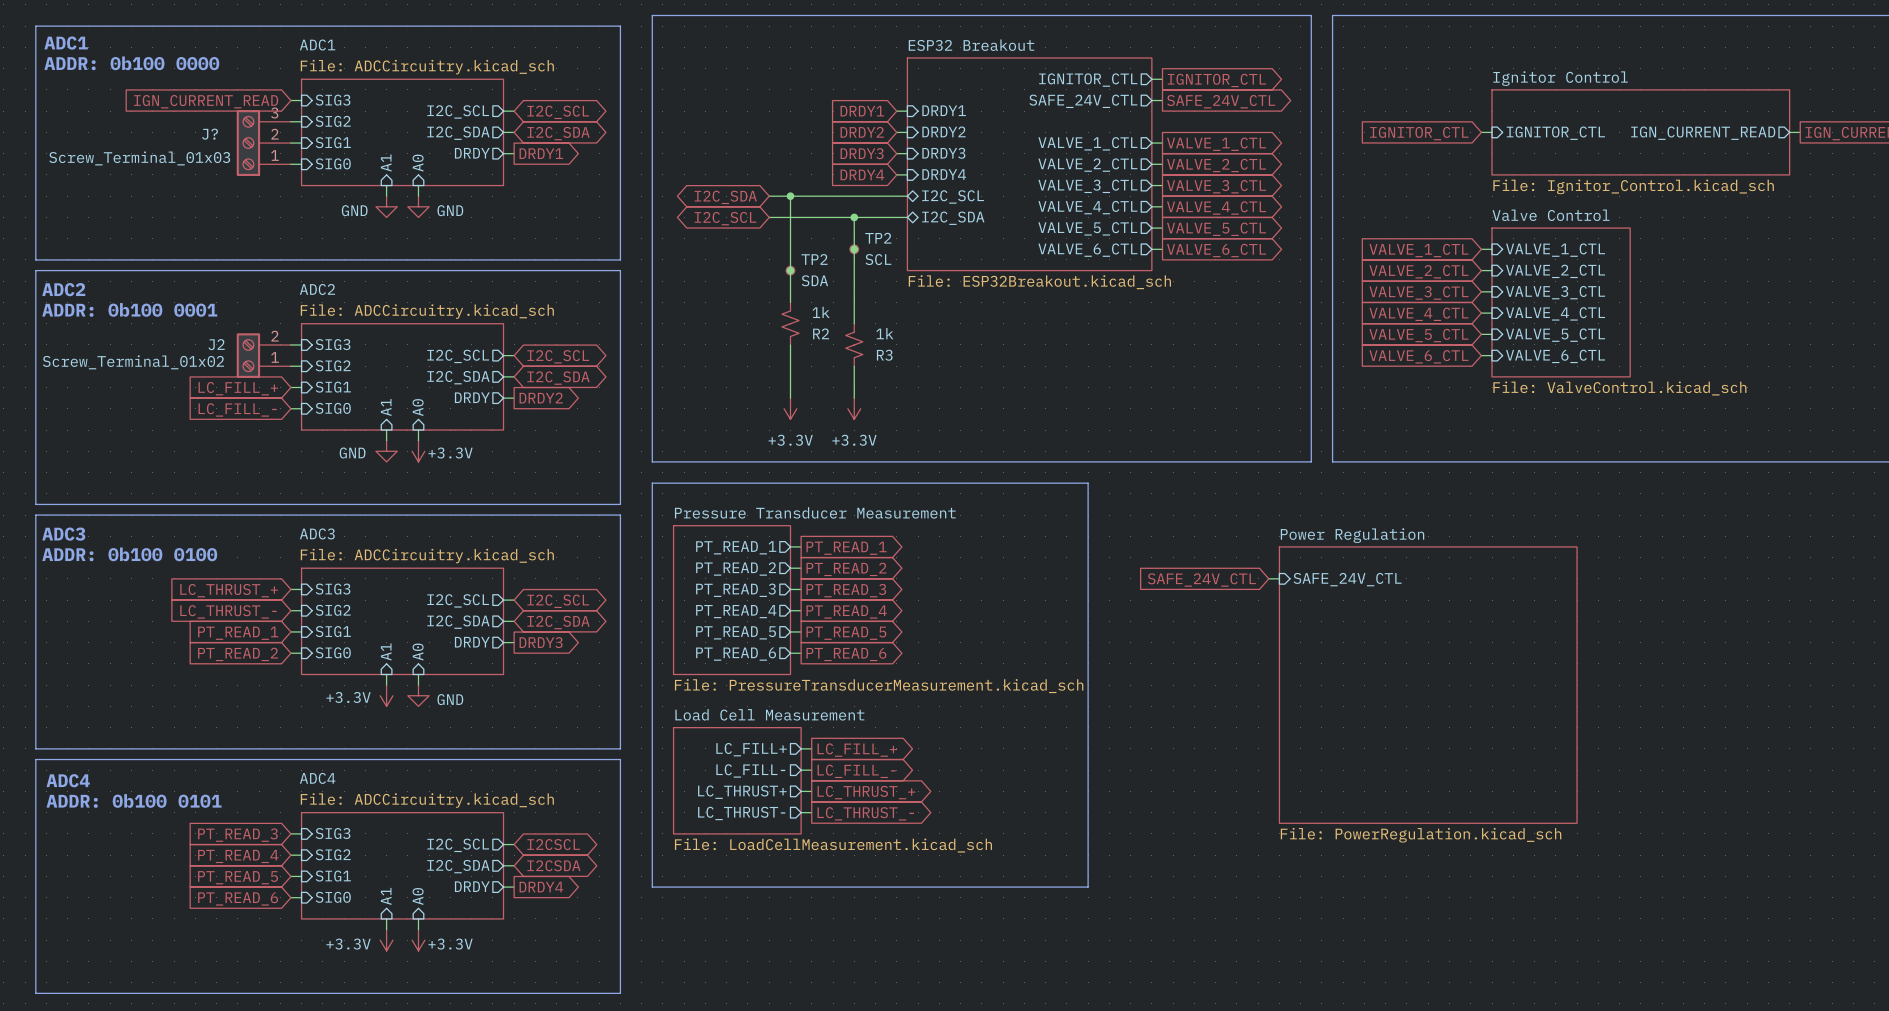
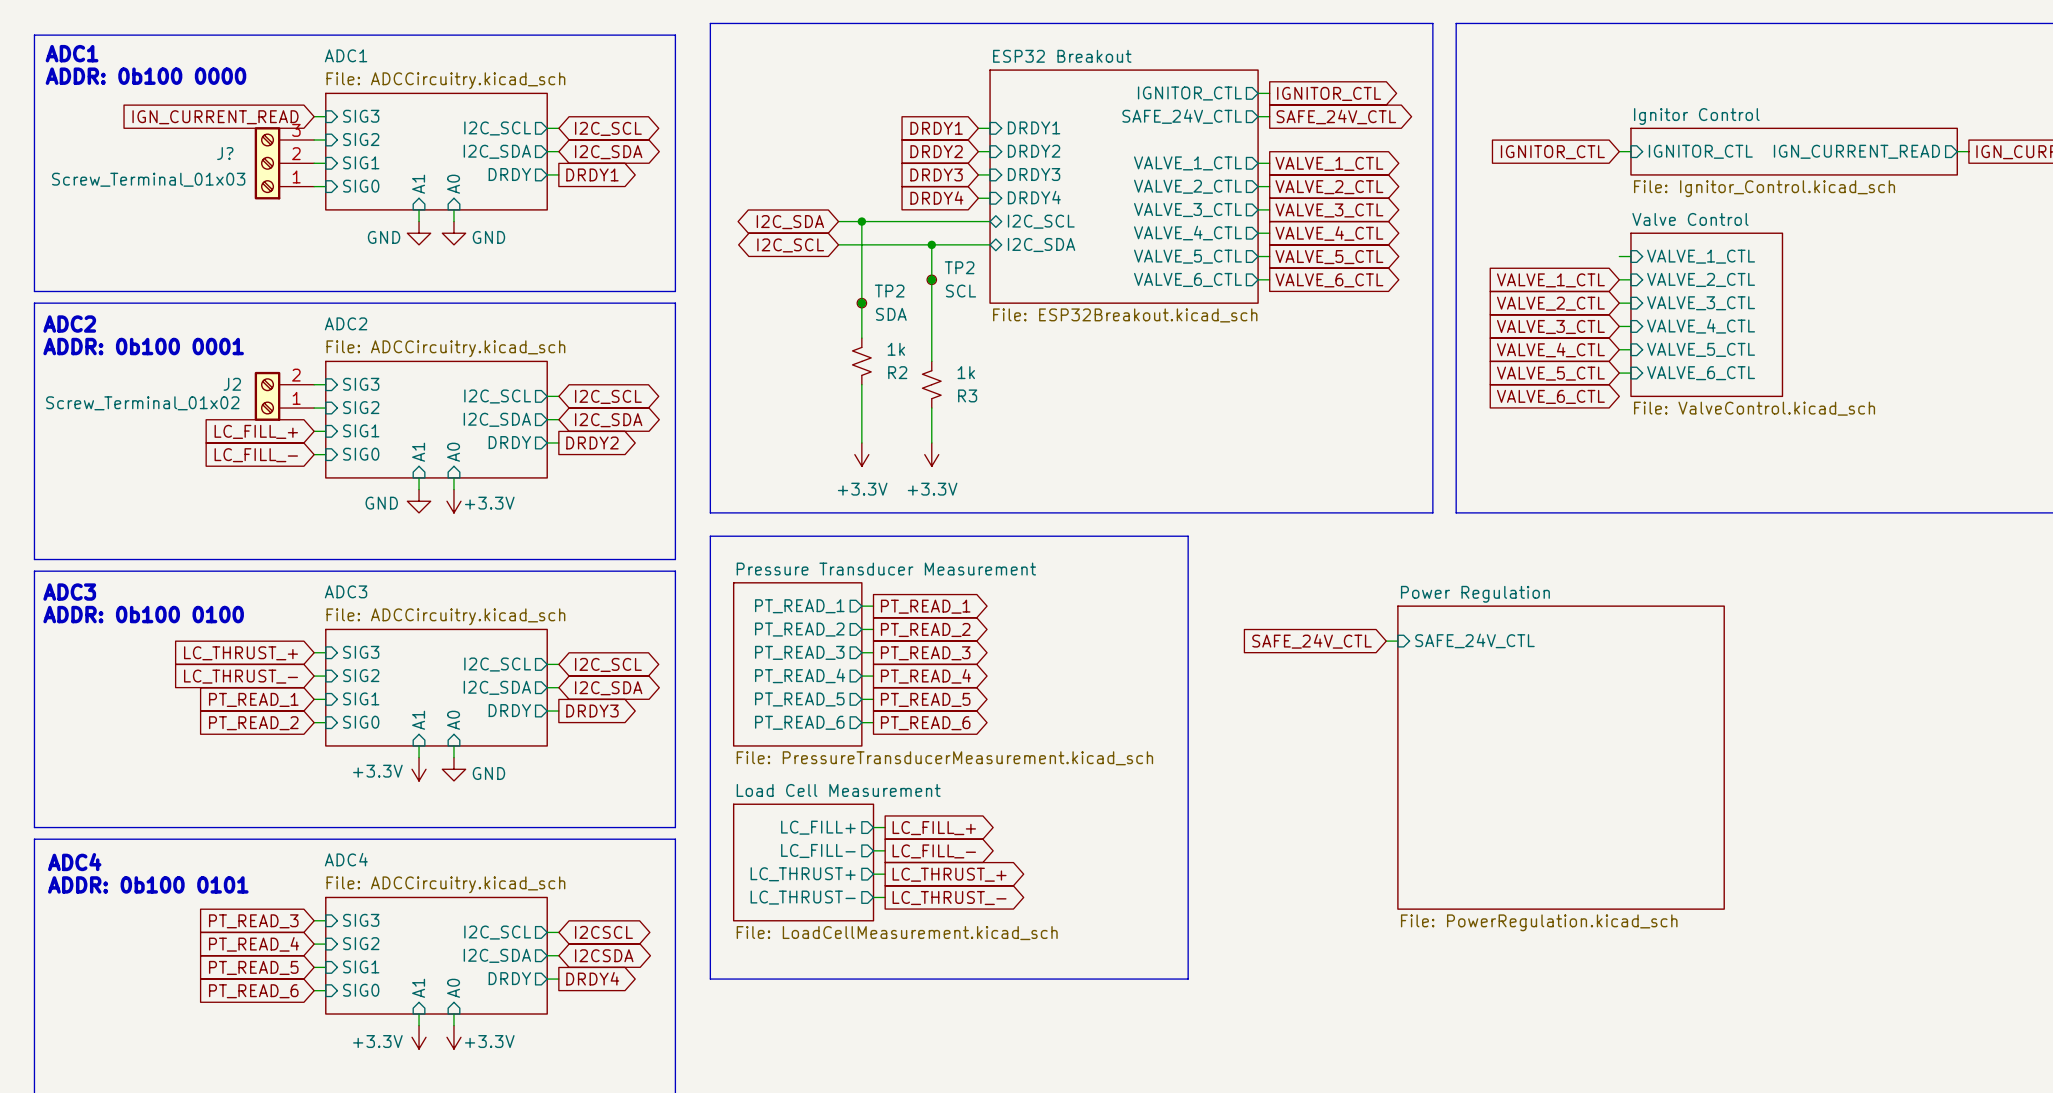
sheet Ignitor Control name position: Ignitor Control (1560, 78) -> Ignitor Control (1696, 116)
sheet Ignitor Control shape: [1491, 89, 1791, 176] -> [1630, 127, 1958, 176]
sheet Ignitor Control value position: File: Ignitor_Control.kicad_sch (1633, 186) -> File: Ignitor_Control.kicad_sch (1764, 188)
sheet pin: none -> VALVE_1_CTL (1701, 256)
sheet pin: VALVE_1_CTL (1555, 250) -> VALVE_2_CTL (1701, 279)
sheet pin: VALVE_2_CTL (1555, 271) -> VALVE_3_CTL (1701, 303)
sheet pin: VALVE_3_CTL (1555, 292) -> VALVE_4_CTL (1701, 326)
sheet Valve Control position: (1561, 302) -> (1706, 314)
sheet pin: VALVE_4_CTL (1555, 313) -> VALVE_5_CTL (1701, 349)
sheet pin: VALVE_5_CTL (1555, 335) -> VALVE_6_CTL (1701, 373)
wire: (1481, 355) (1492, 355) -> (1619, 256) (1630, 256)
sheet pin: VALVE_6_CTL (1555, 356) -> none

